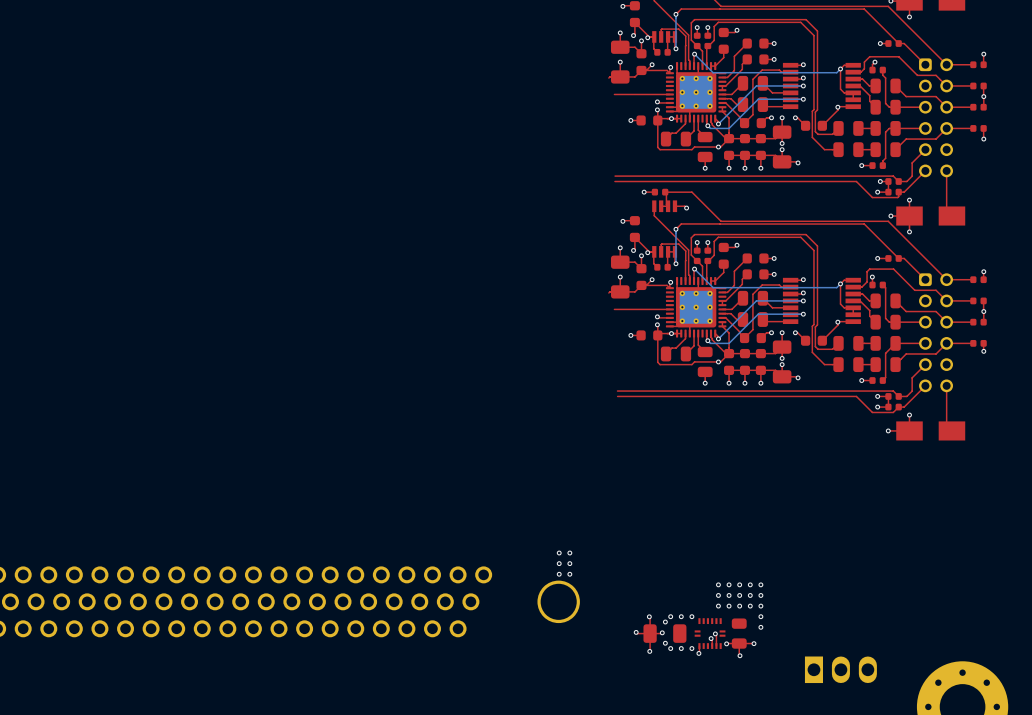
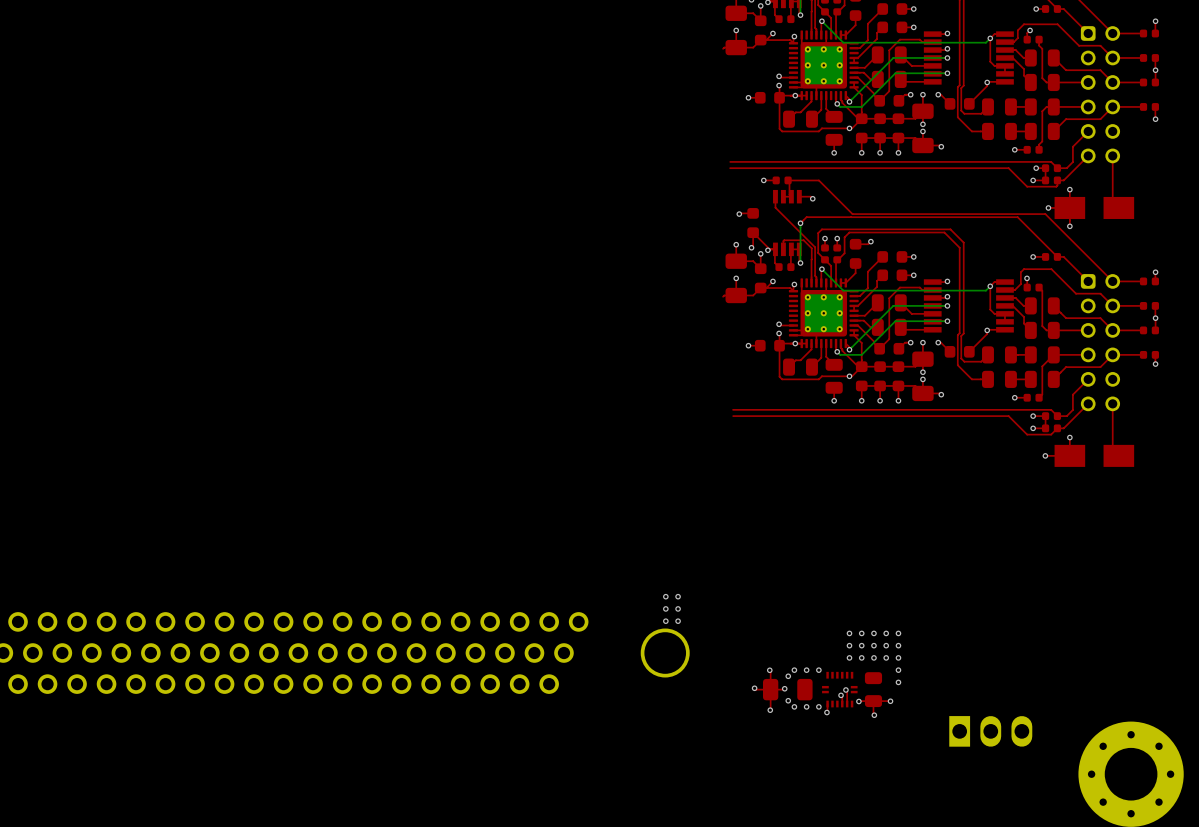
top track: (669, 94) (614, 94) -> none
top track: (669, 309) (614, 309) -> none

